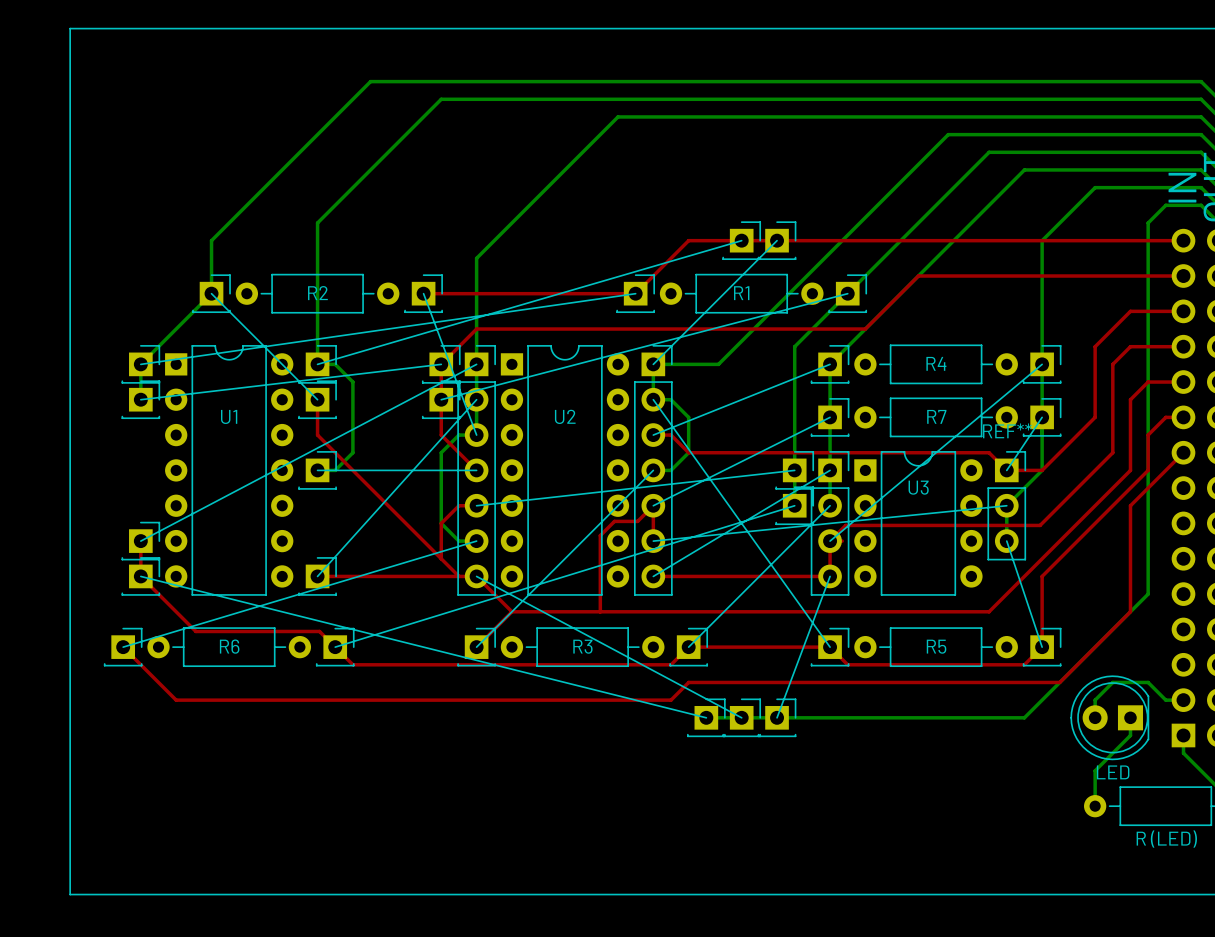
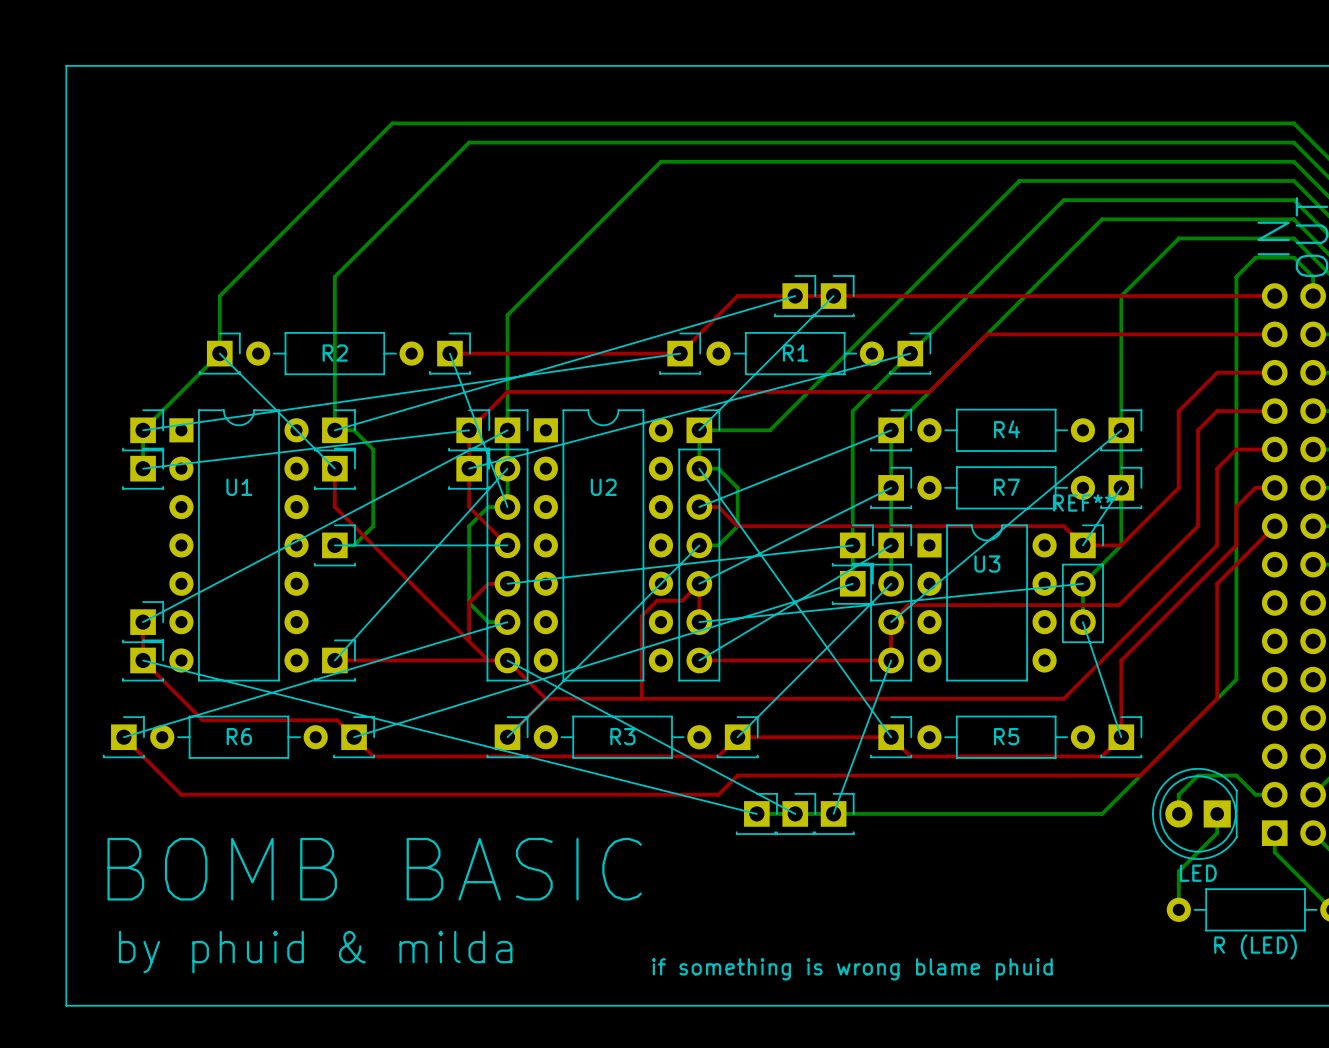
text: none -> BOMB BASIC (374, 869)
text: none -> by phuid & milda (315, 952)
text: none -> if something is wrong blame phuid (852, 969)

